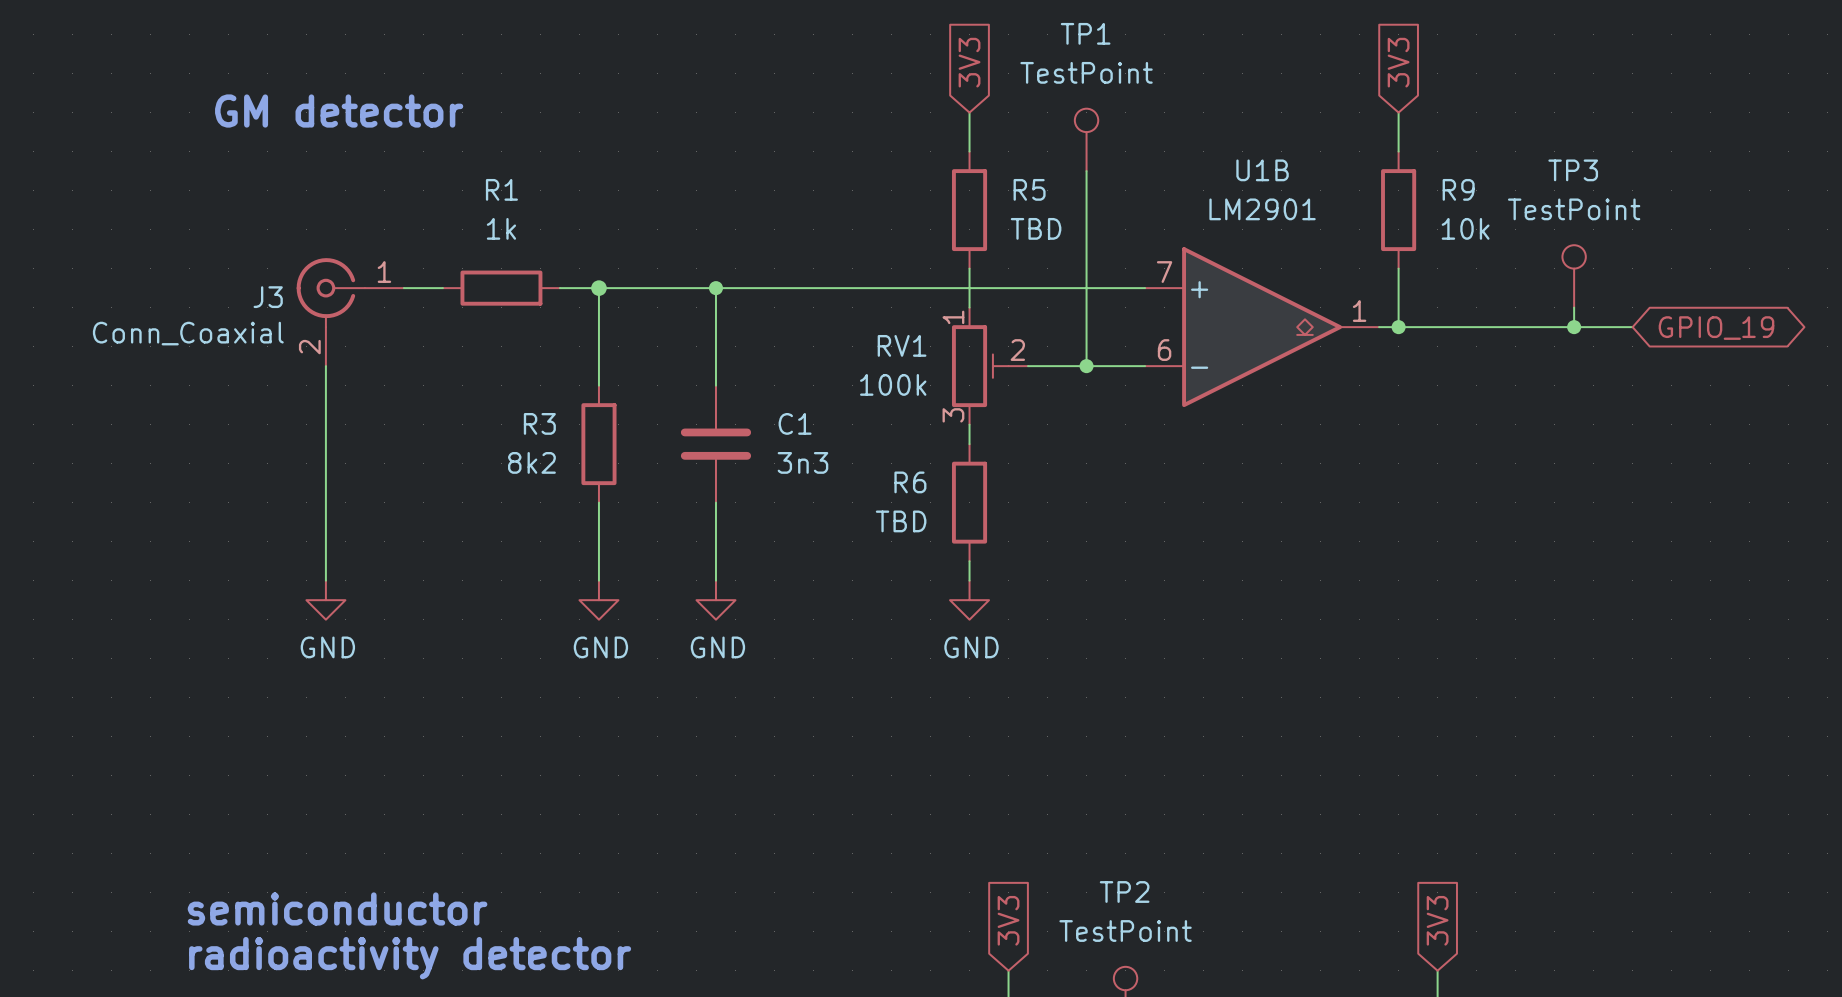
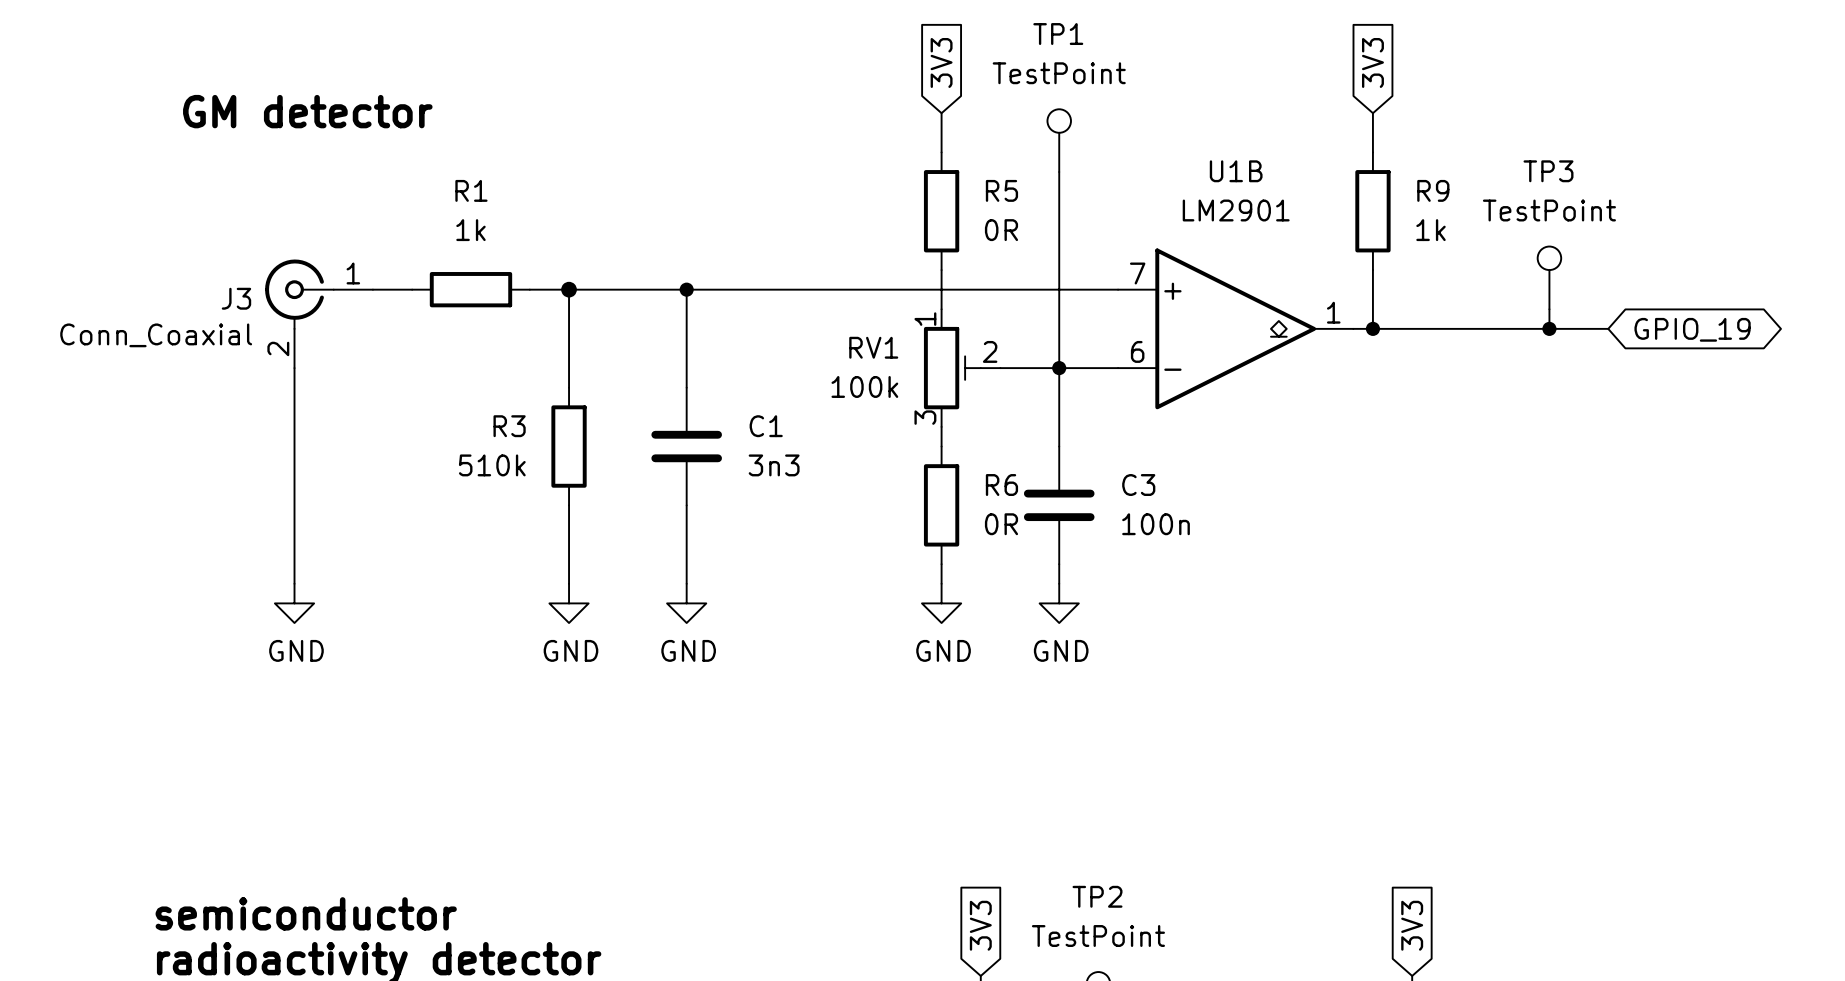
R5 value: TBD (1036, 228) -> 0R (1001, 230)
R9 value: 10k (1465, 228) -> 1k (1431, 230)
wire: none -> (1059, 368) (1059, 446)
R3 value: 8k2 (531, 462) -> 510k (492, 465)
R6 name position: R6 (910, 482) -> R6 (1001, 485)
C3: none -> 100n (1059, 505)
R6 value: TBD (901, 521) -> 0R (1001, 524)
wire: none -> (1059, 564) (1059, 583)
power symbol: none -> GND (1059, 603)

